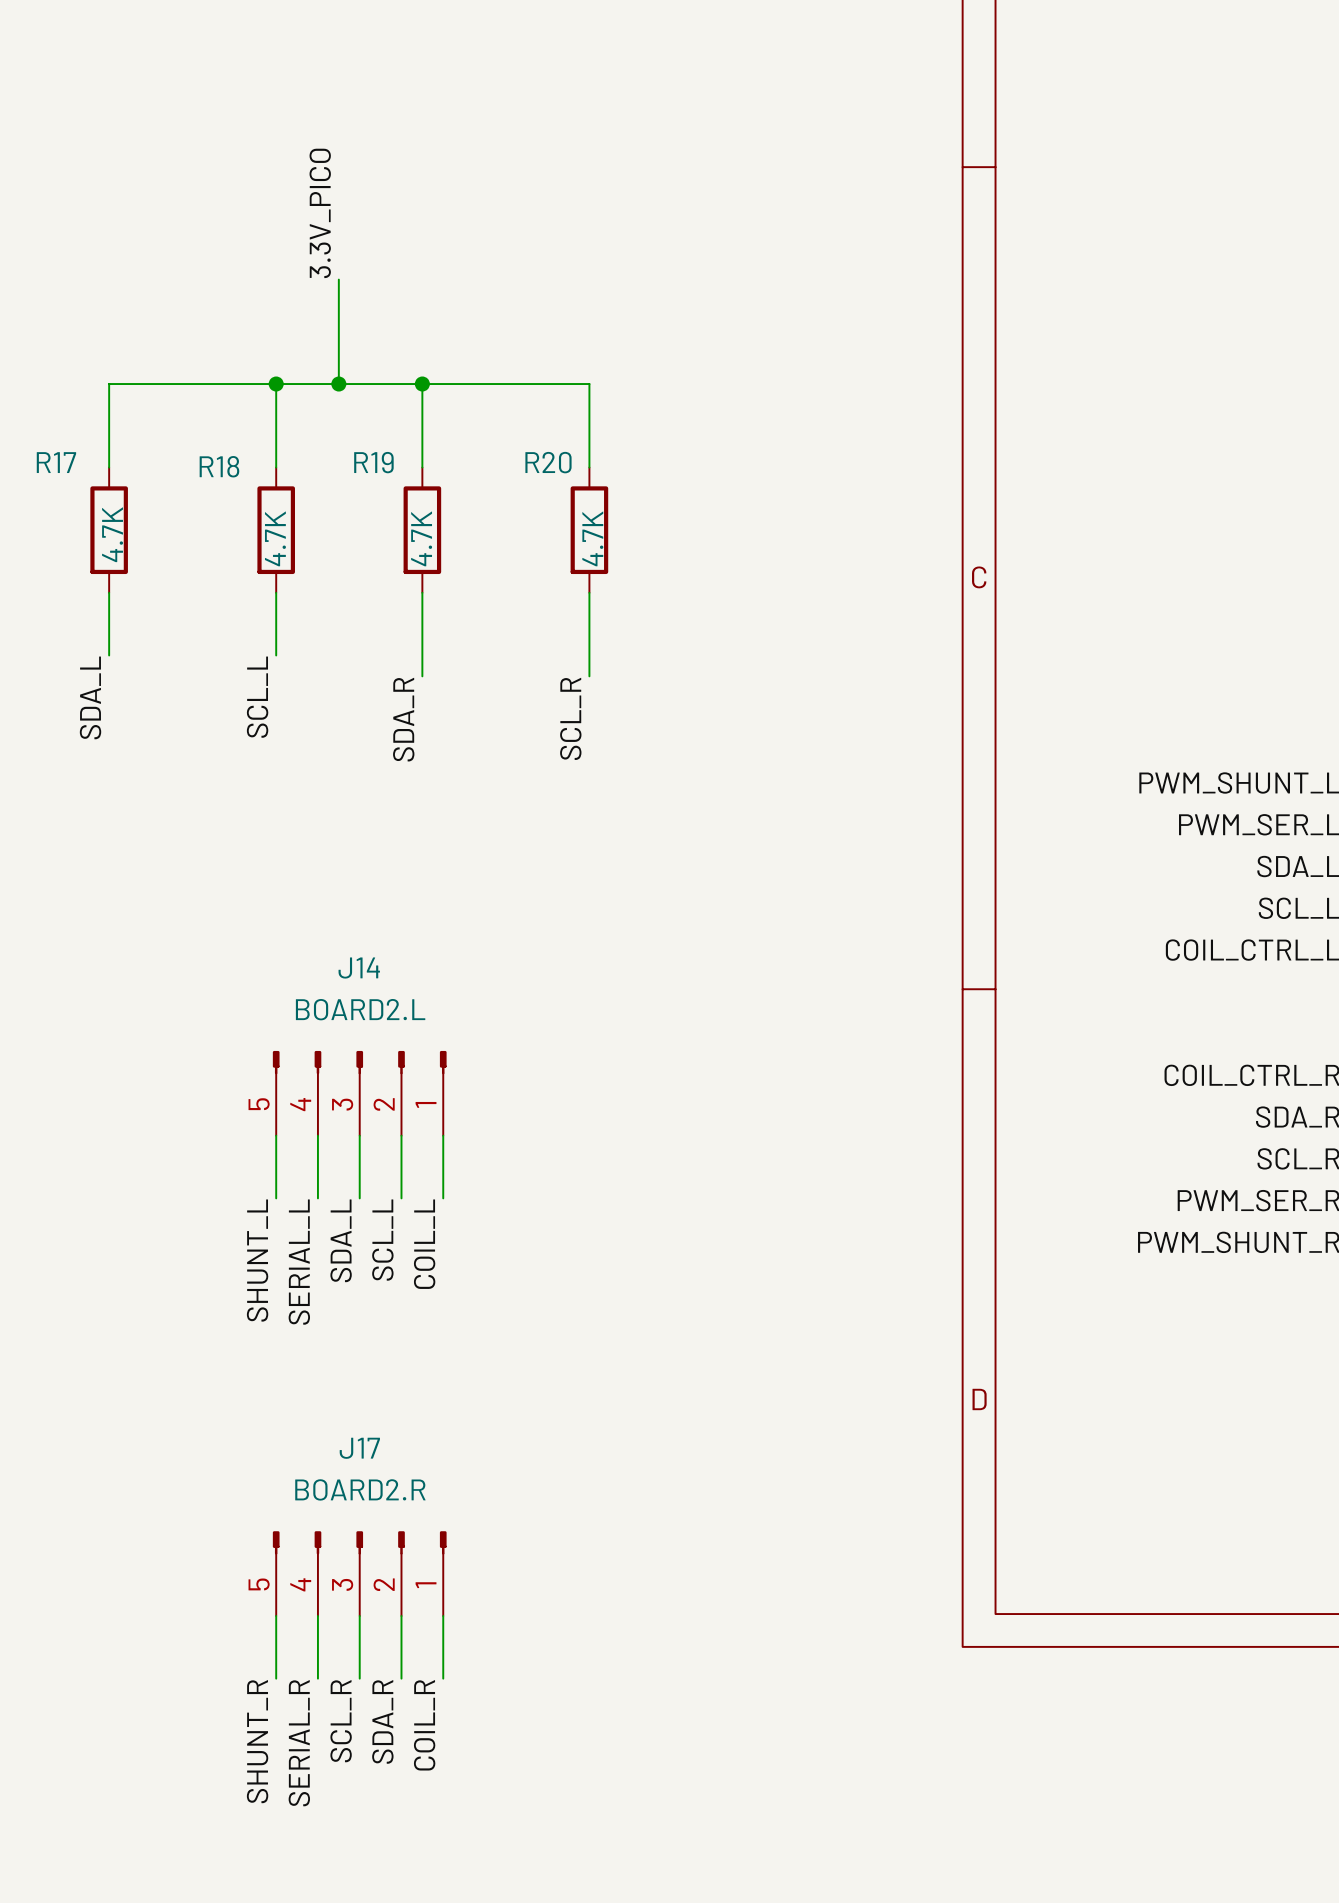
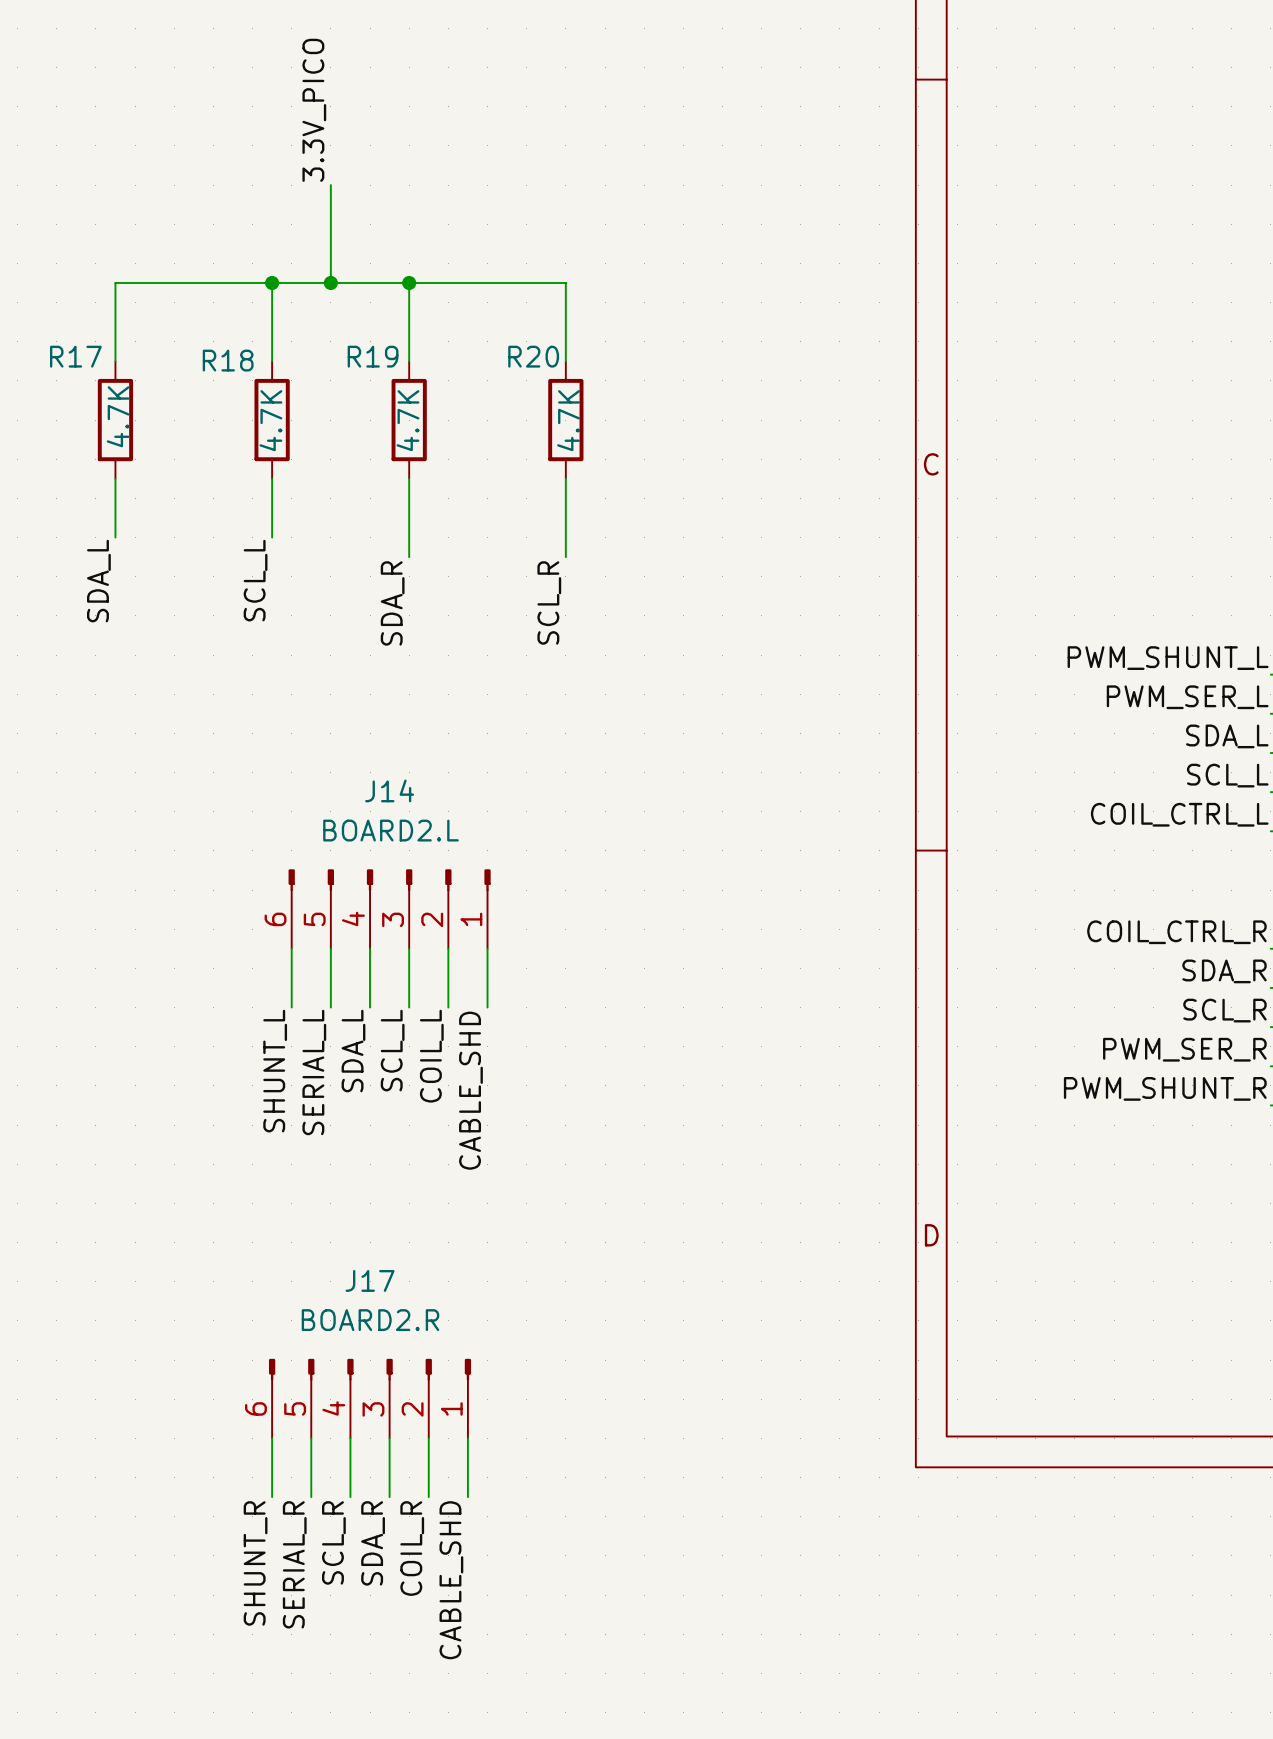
J14 symbol: [272, 1050, 447, 1136] -> [288, 869, 491, 949]
wire: none -> (487, 948) (487, 1007)
wire: (276, 1135) (276, 1198) -> (291, 948) (291, 1007)
wire: (317, 1135) (317, 1198) -> (330, 948) (330, 1007)
wire: (359, 1135) (359, 1198) -> (370, 948) (370, 1007)
wire: (401, 1135) (401, 1198) -> (409, 948) (409, 1007)
wire: (443, 1135) (443, 1198) -> (448, 948) (448, 1007)
label: none -> CABLE_SHD (470, 1090)
label position: SDA_L (341, 1240) -> SDA_L (353, 1051)
label position: SCL_L (382, 1240) -> SCL_L (392, 1050)
label position: COIL_L (424, 1244) -> COIL_L (431, 1056)
label position: SHUNT_L (257, 1260) -> SHUNT_L (275, 1071)
label position: SERIAL_L (299, 1262) -> SERIAL_L (314, 1072)
J17 symbol: [272, 1531, 447, 1617] -> [268, 1358, 472, 1439]
wire: none -> (467, 1438) (467, 1497)
label: none -> CABLE_SHD (451, 1580)

